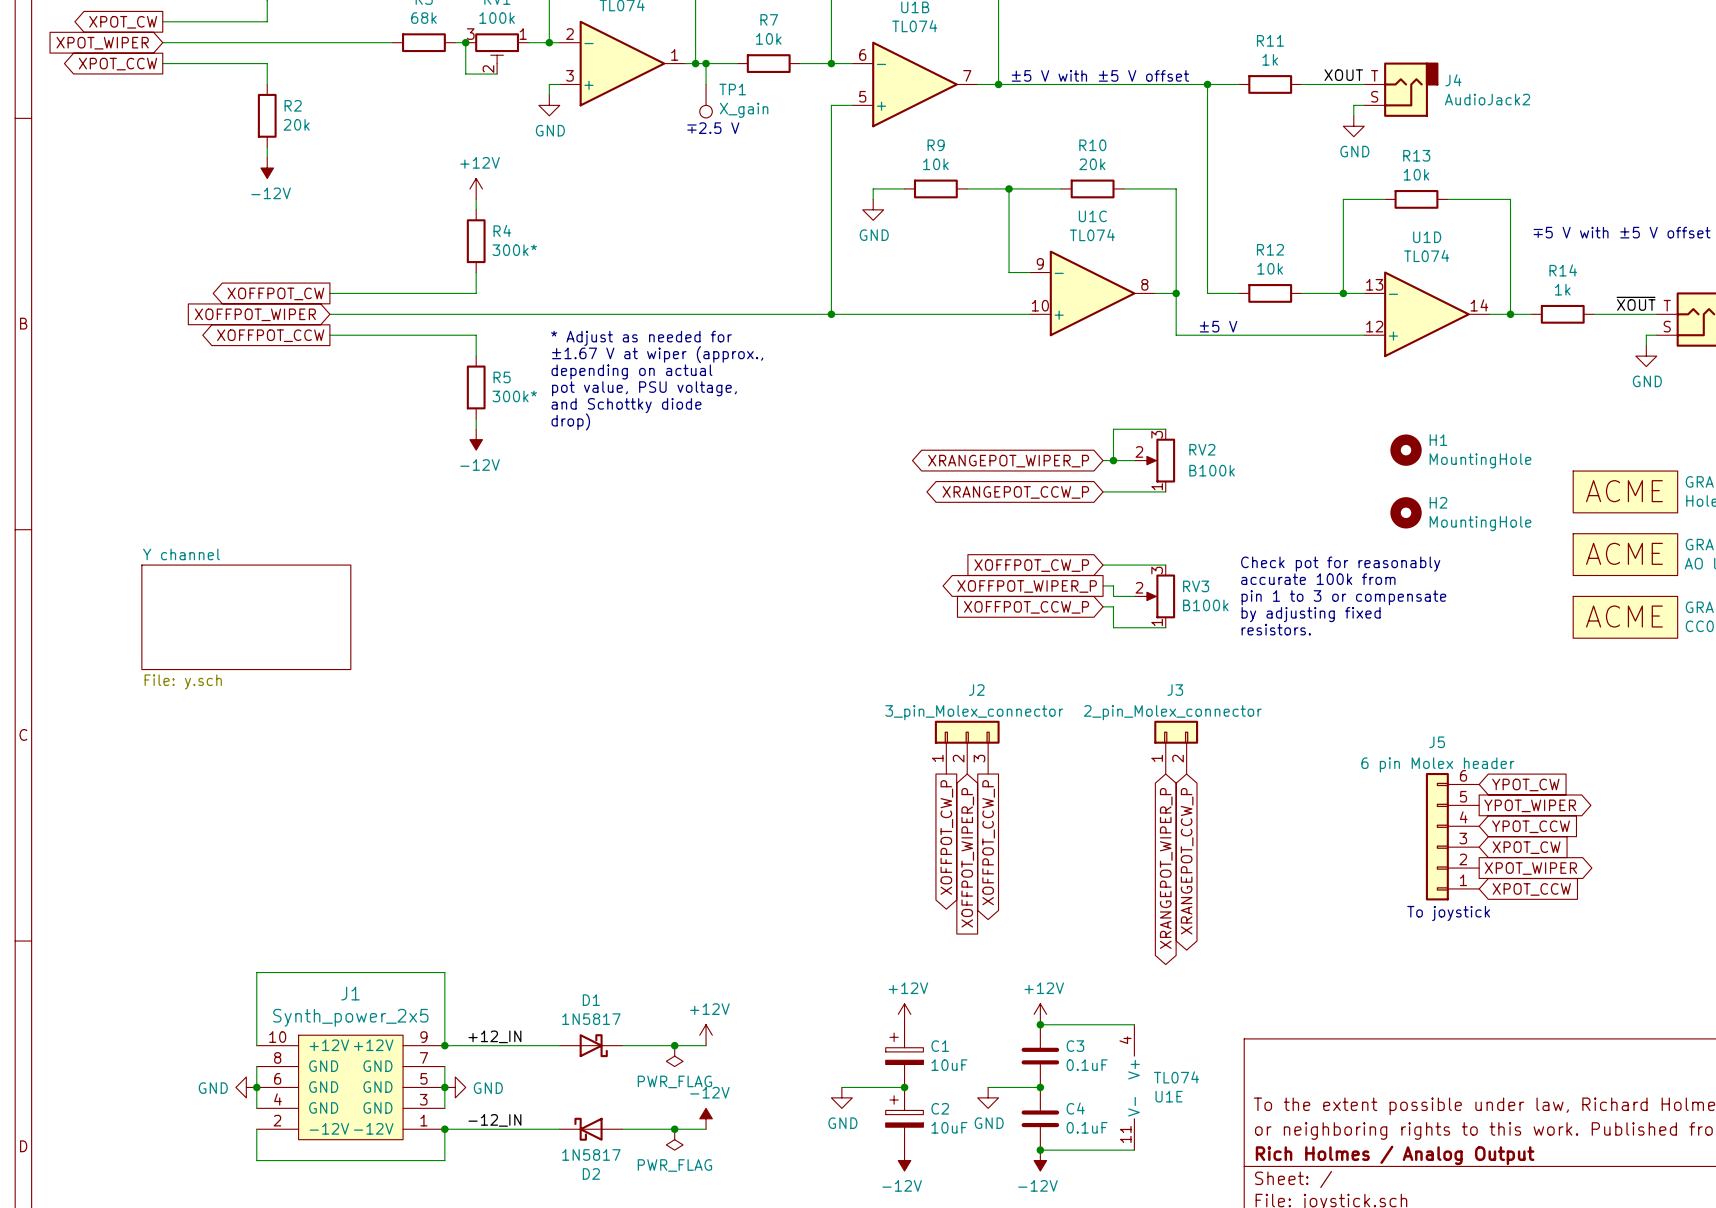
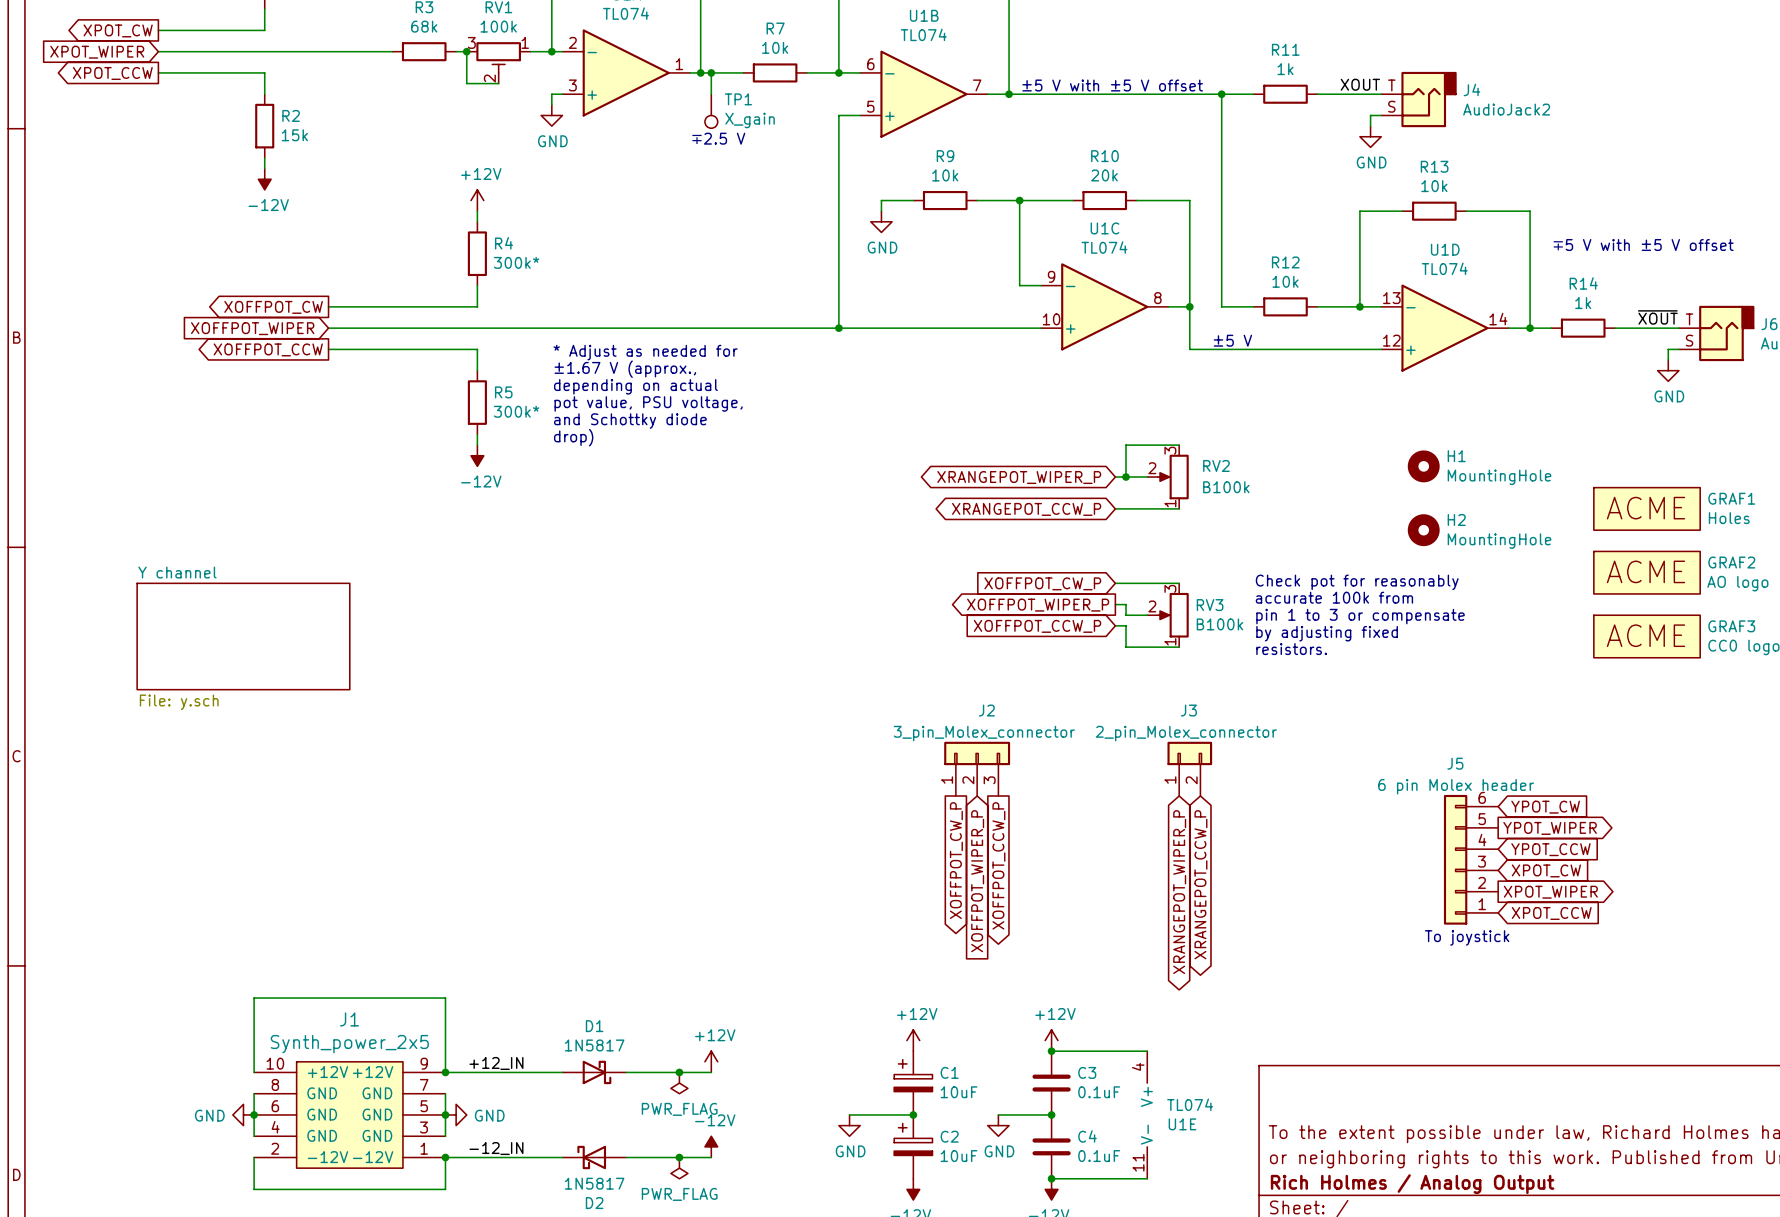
R2 value: 20k (296, 124) -> 15k (294, 135)
text: ±1.67 V at wiper (approx., (657, 354) -> ±1.67 V (approx., (625, 369)

